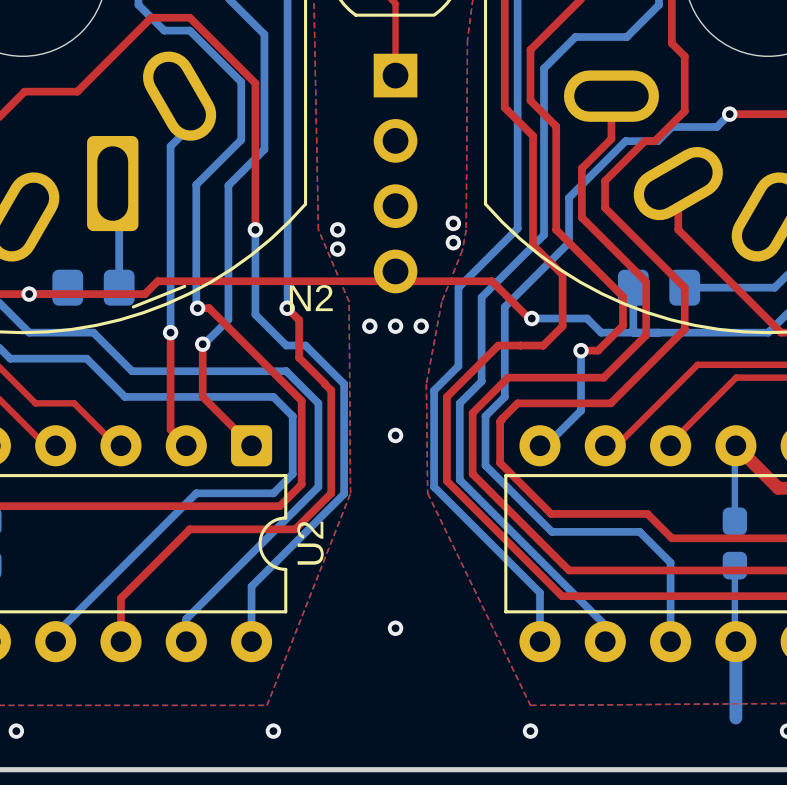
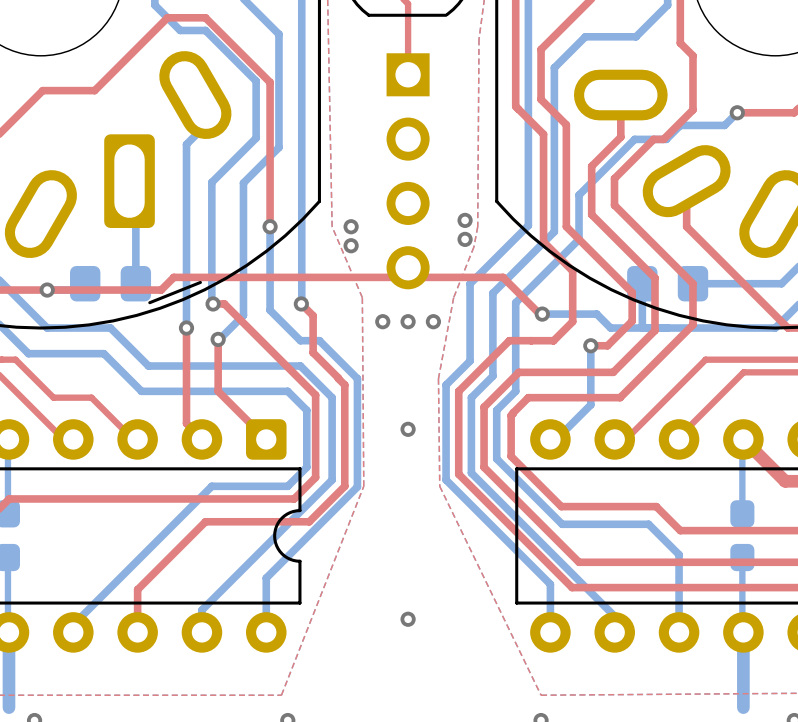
N2 name: N2 (311, 298) -> none
U2 name: U2 (310, 543) -> none

